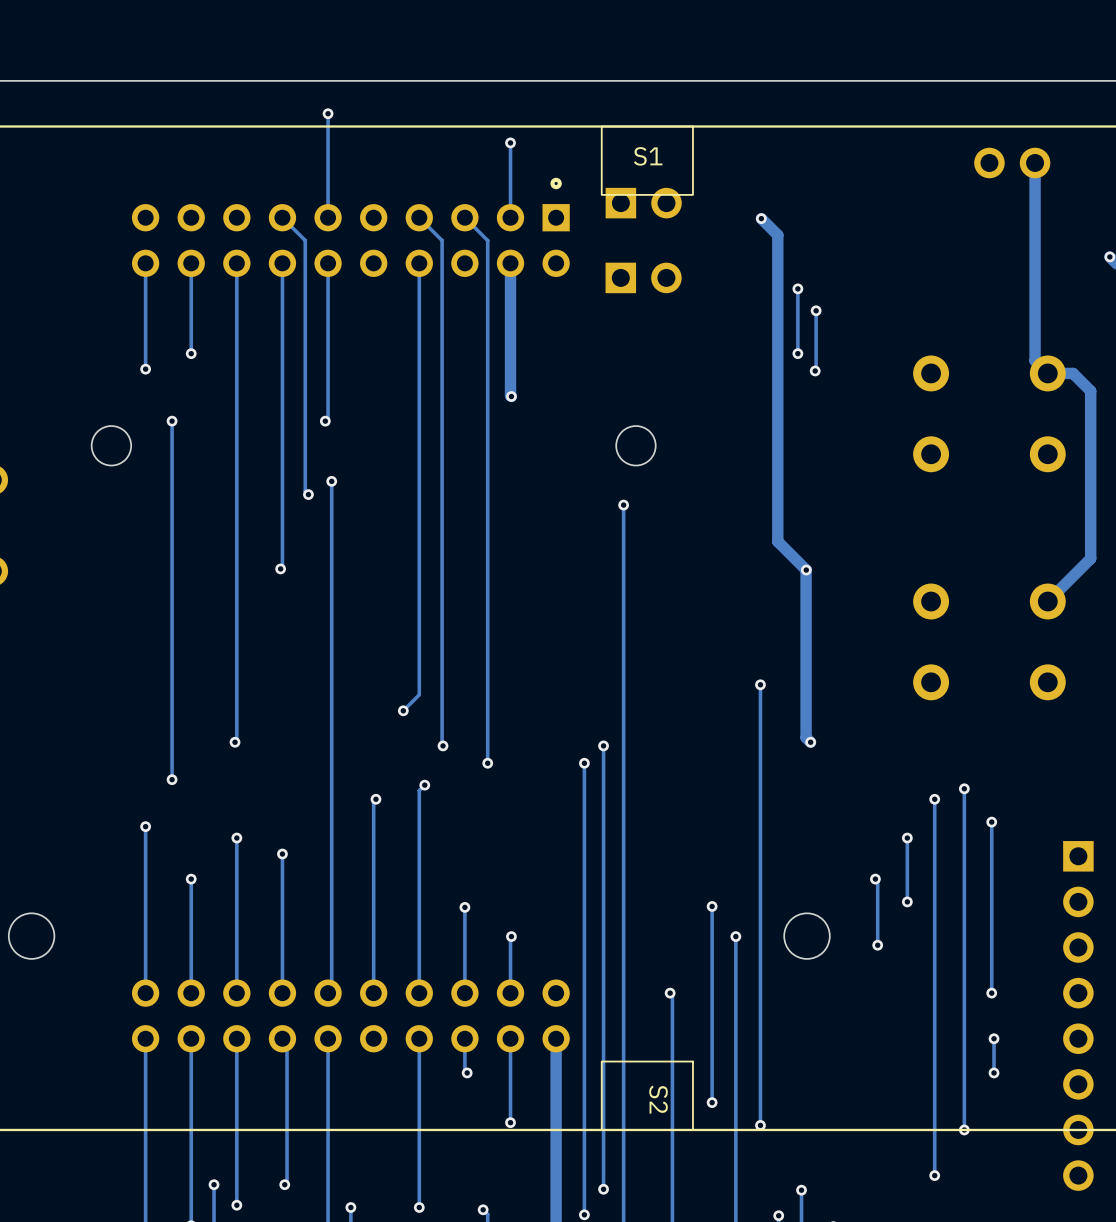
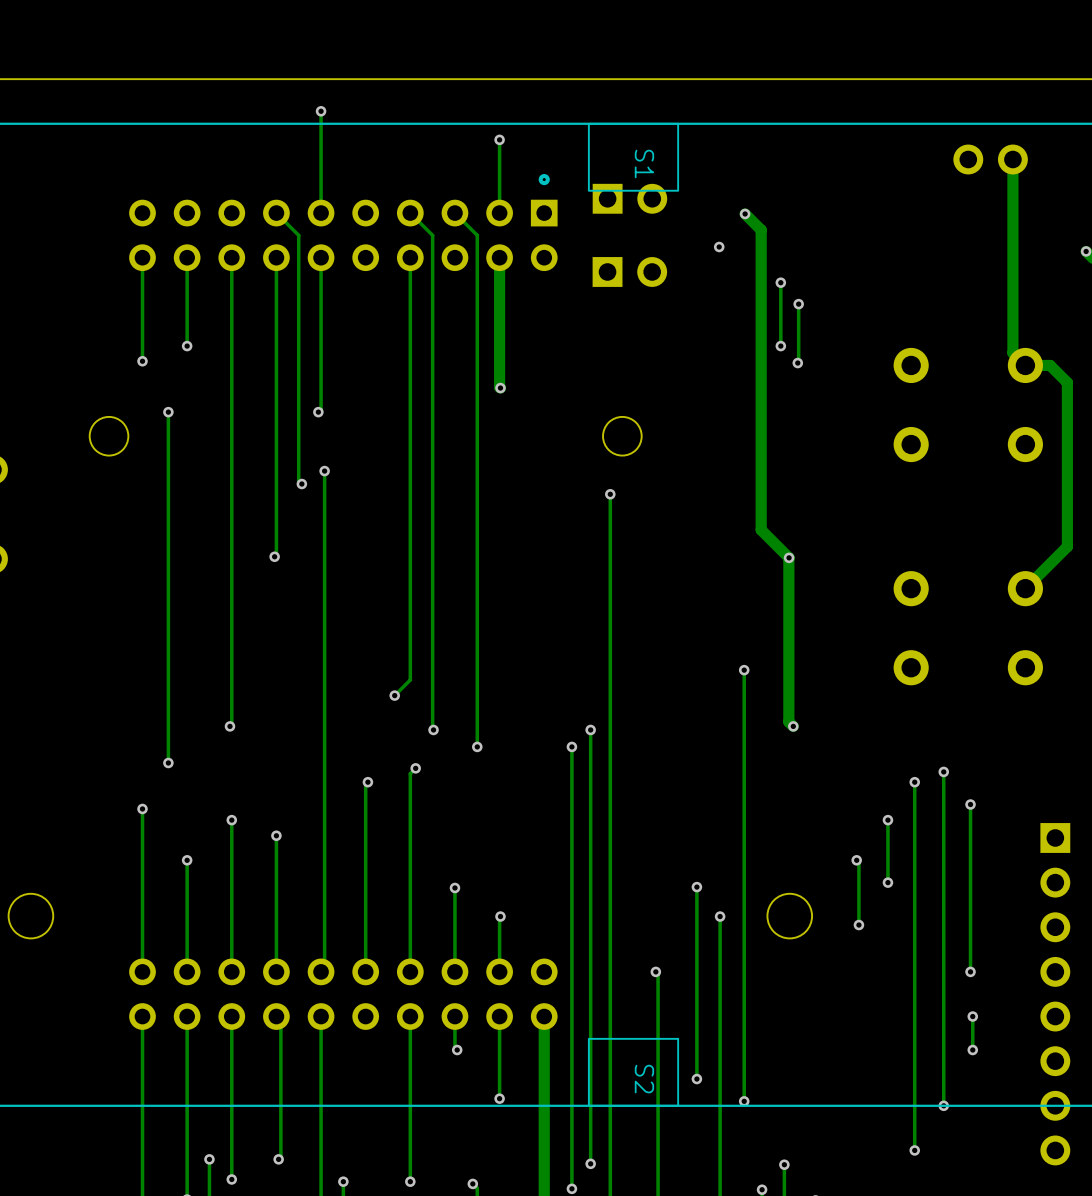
text: S1 (648, 156) -> none
part text: none -> S1 (644, 164)
via: none -> (719, 246)

